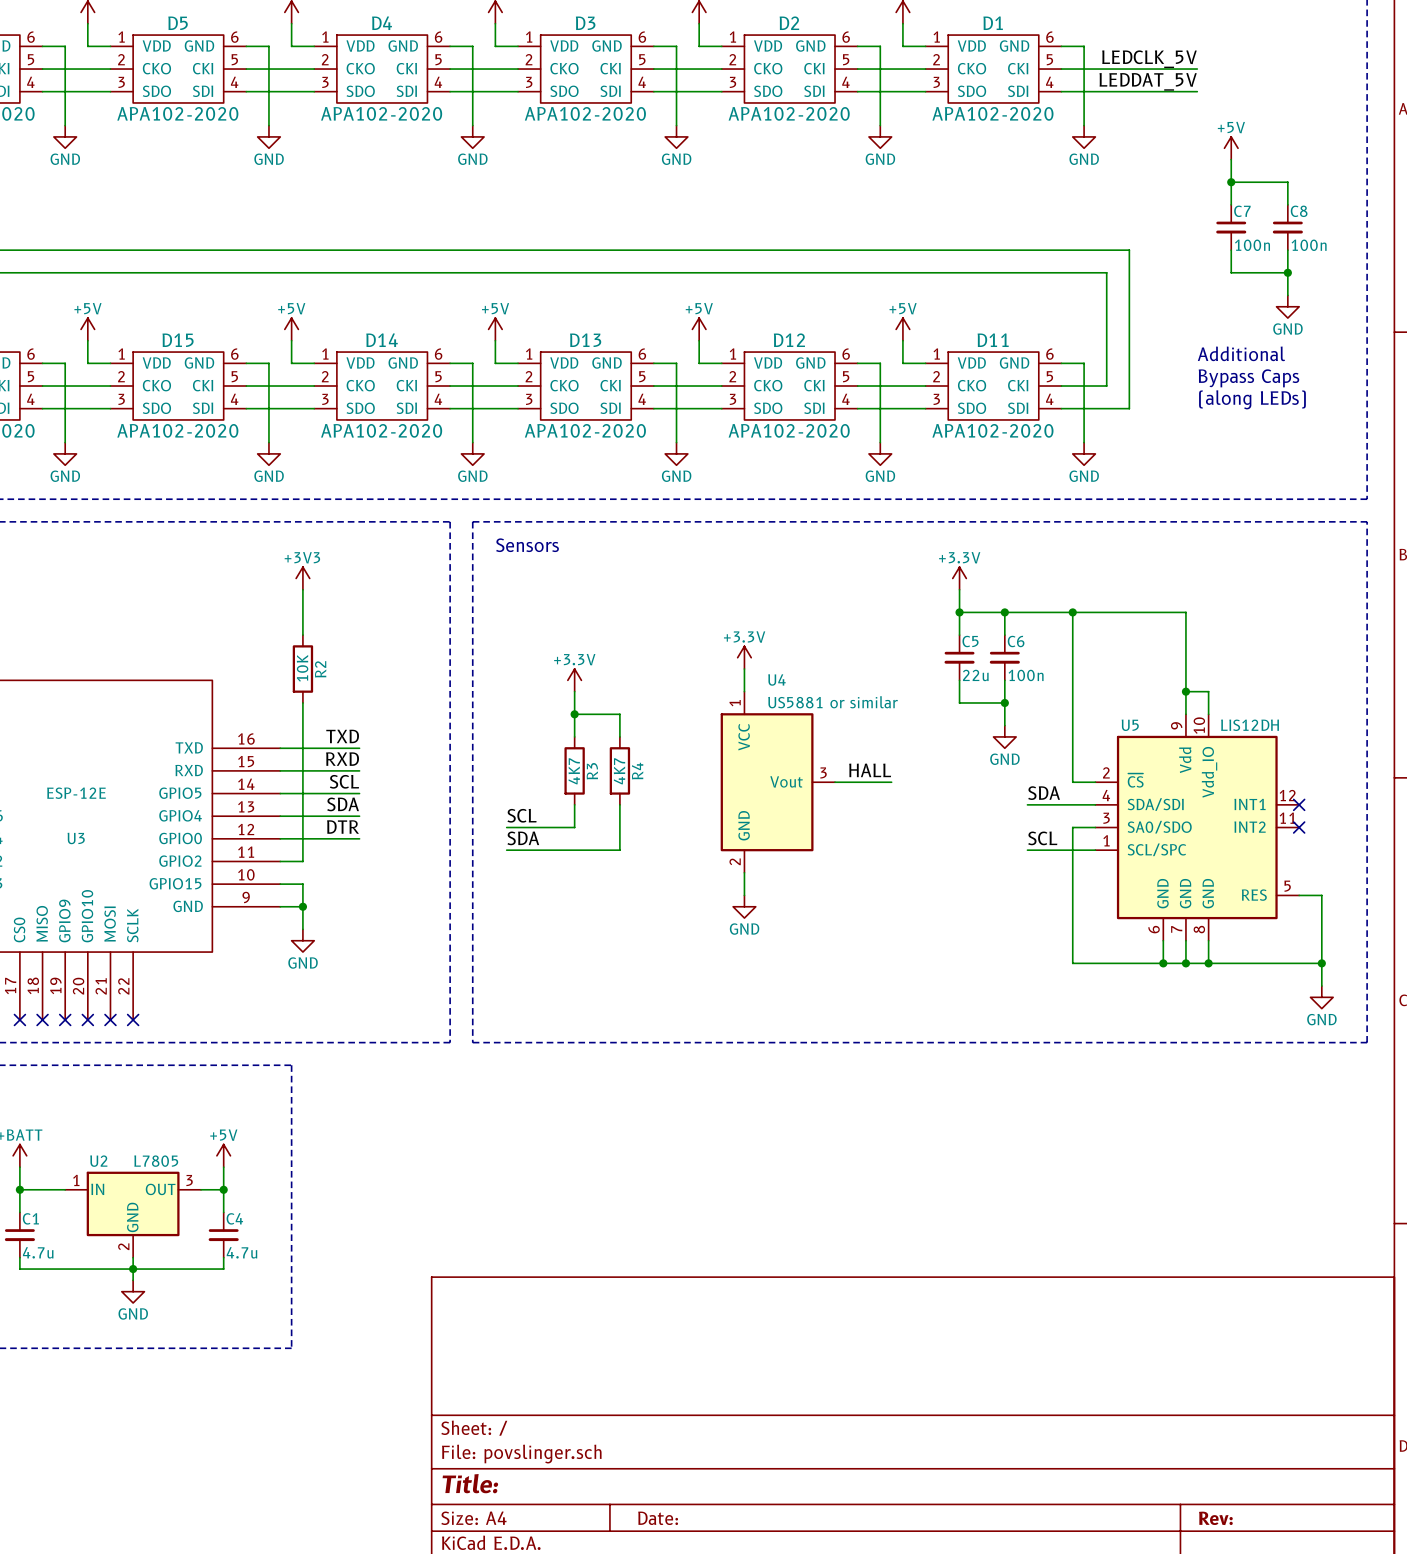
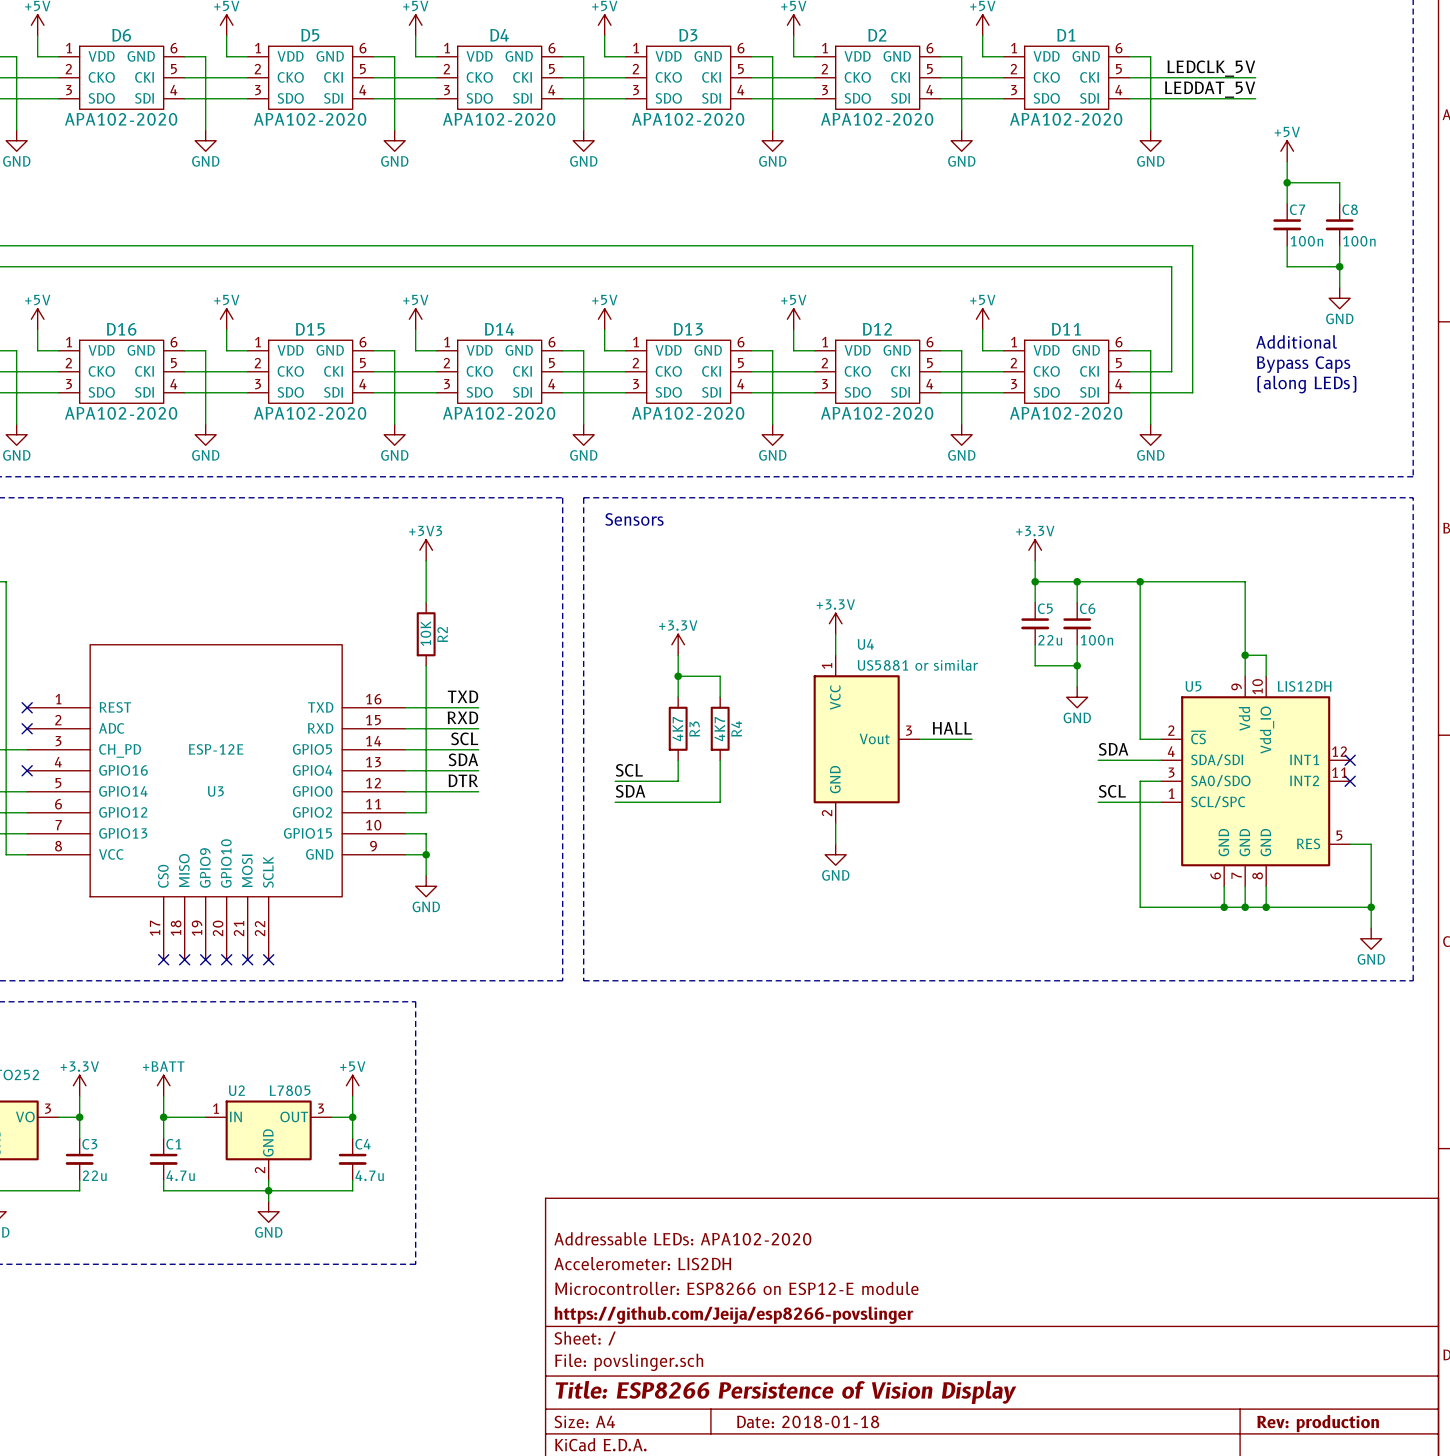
title block: none -> Addressable LEDs: APA102-2020 (682, 1238)
title block: none -> Accelerometer: LIS2DH (642, 1263)
title block: none -> Microcontroller: ESP8266 on ESP12-E module (736, 1288)
title block: none -> https://github.com/Jeija/esp8266-povslinger (733, 1315)
title block: Title: (470, 1483) -> Title: ESP8266 Persistence of Vision Display (786, 1392)
title block: Date: (658, 1518) -> Date: 2018-01-18 (808, 1421)
title block: Rev: (1215, 1518) -> Rev: production (1318, 1423)

